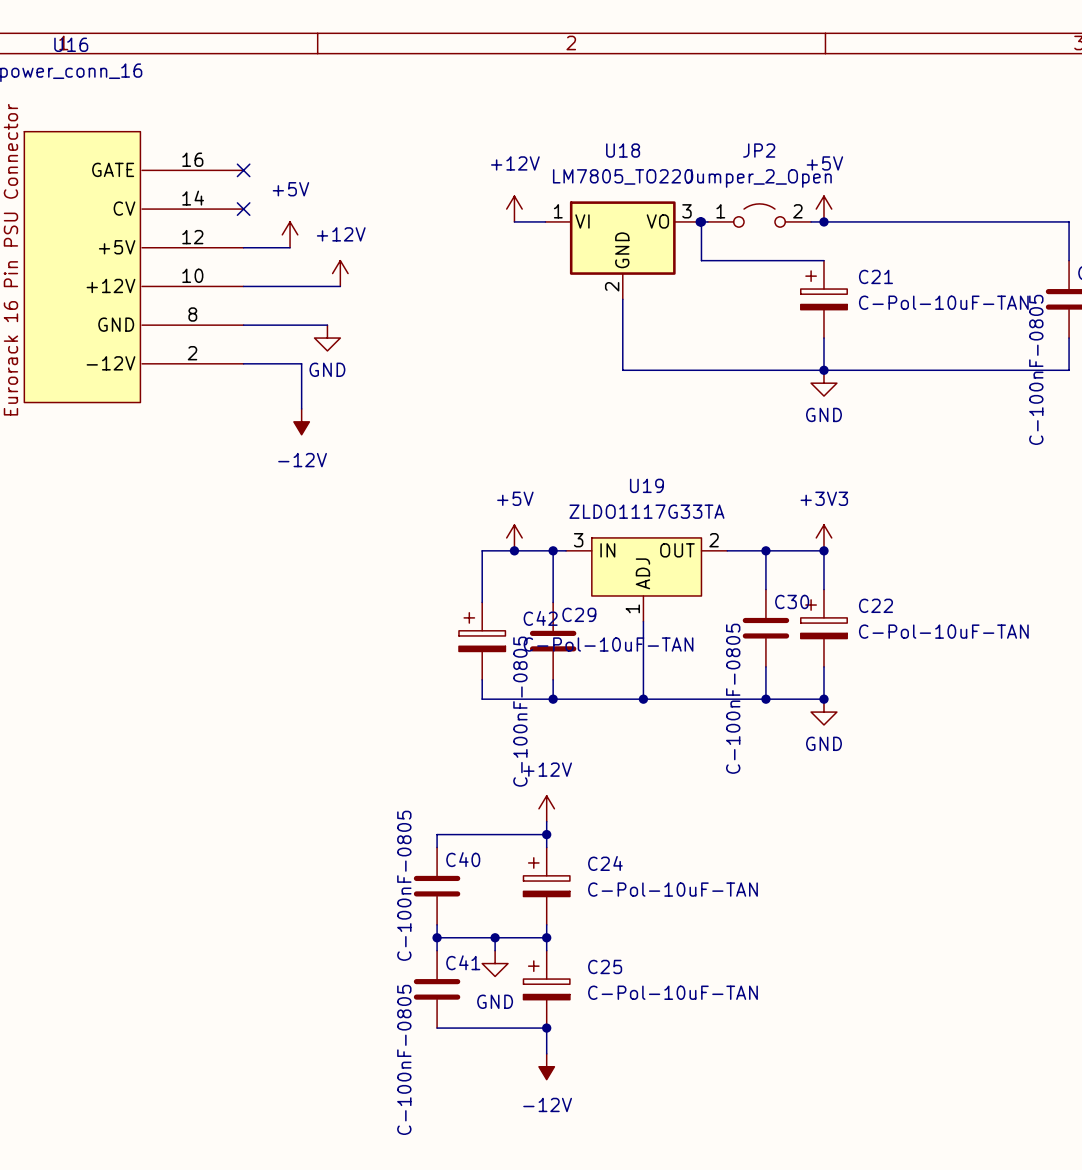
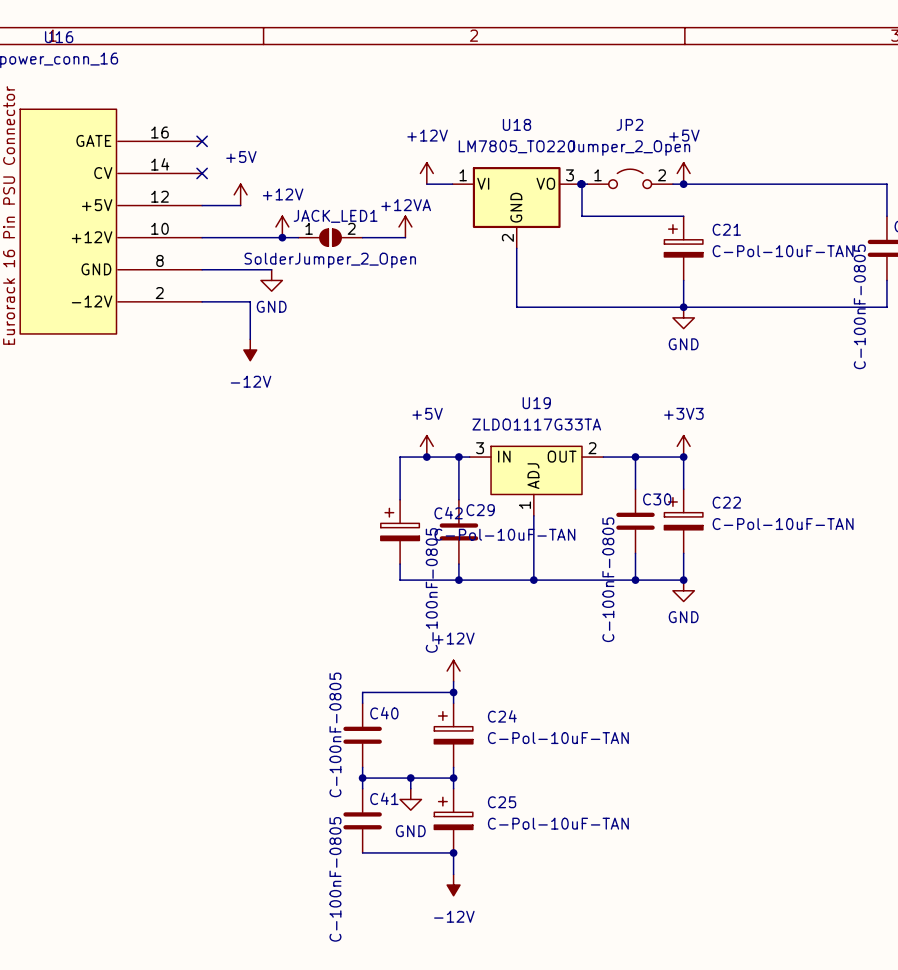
power symbol: none -> +12VA (405, 226)
wire: none -> (282, 237) (298, 237)
junction: none -> (282, 237)
JACK_LED1: none -> SolderJumper_2_Open (330, 237)
wire: none -> (362, 237) (405, 237)

